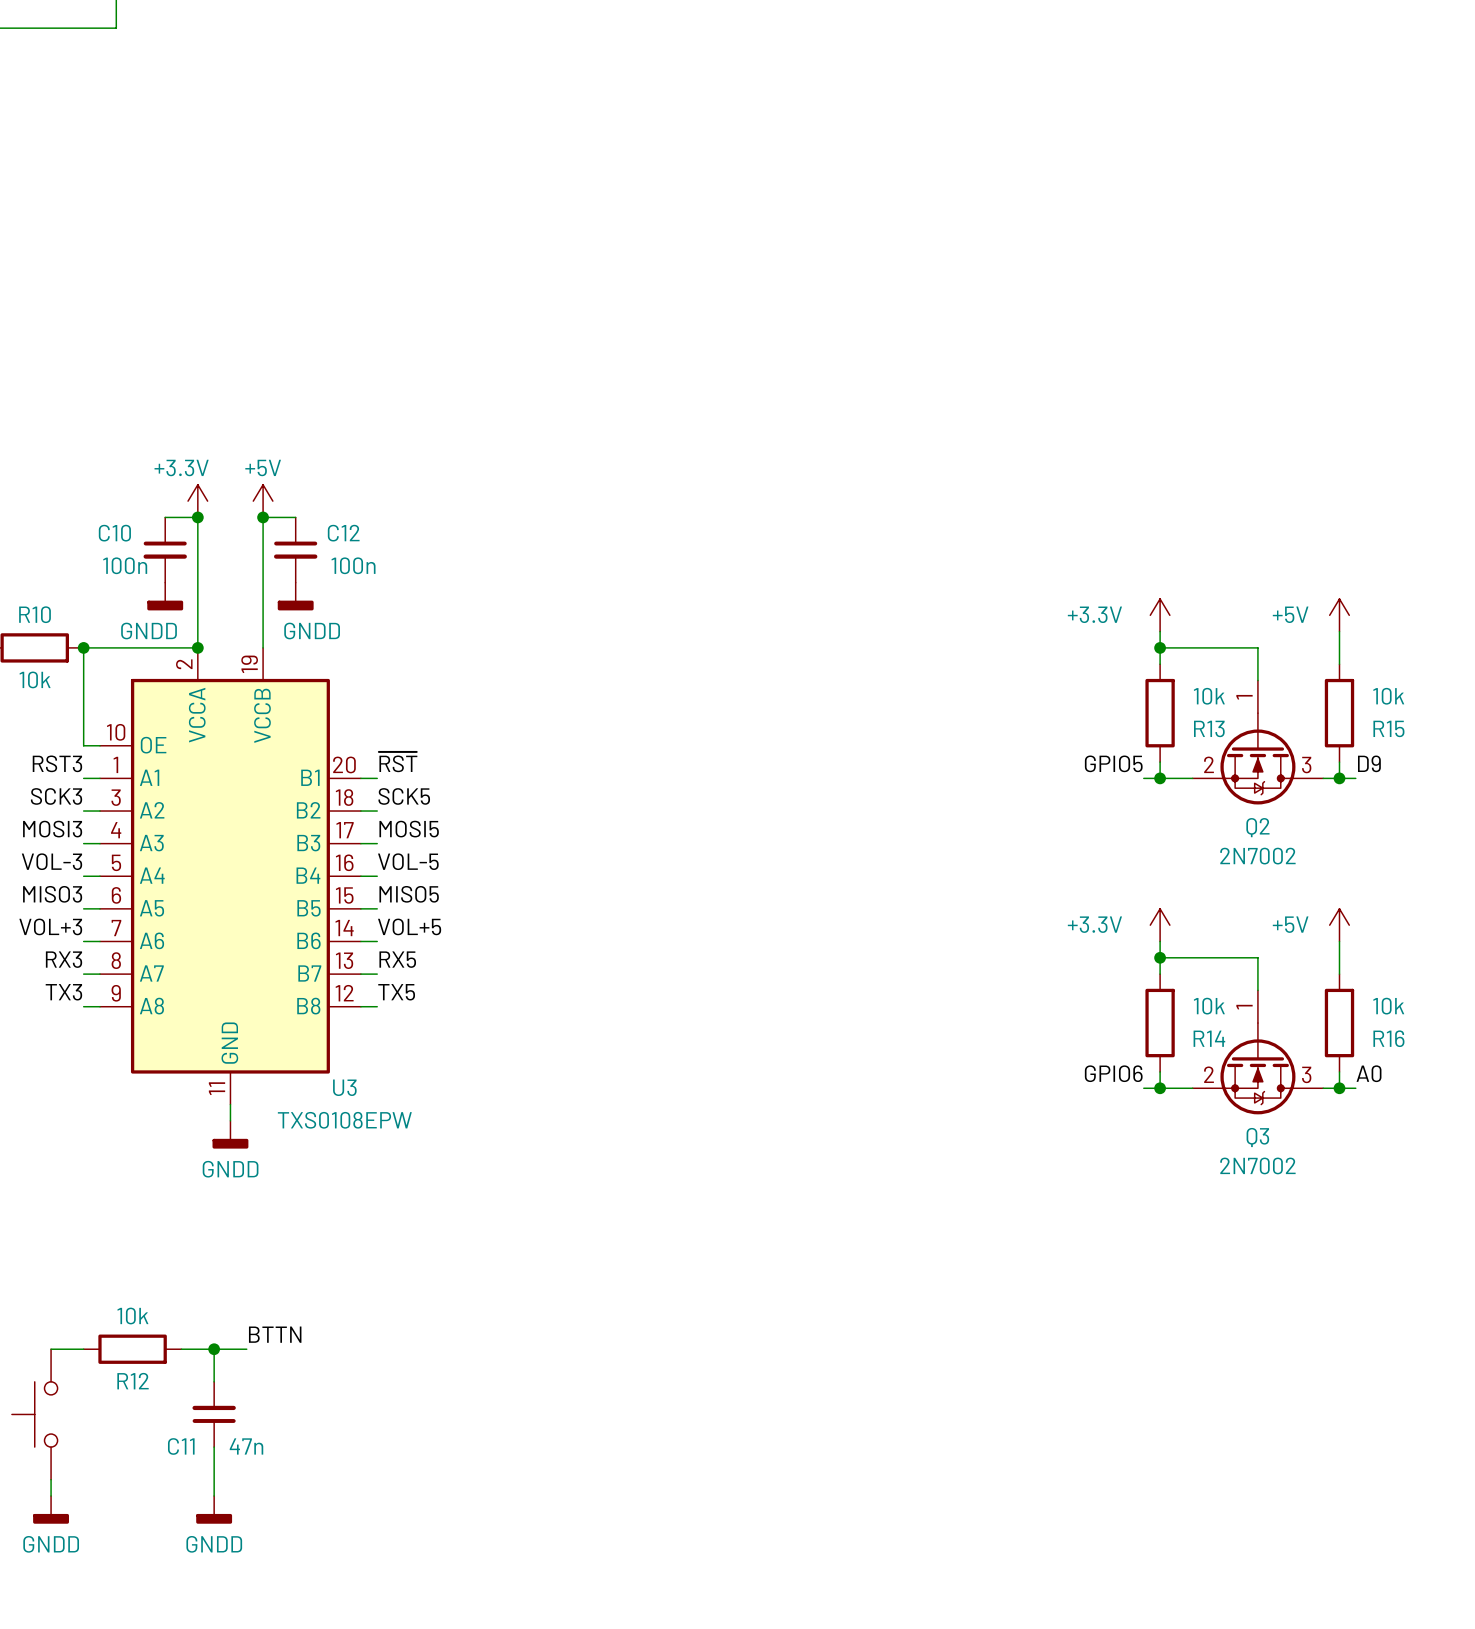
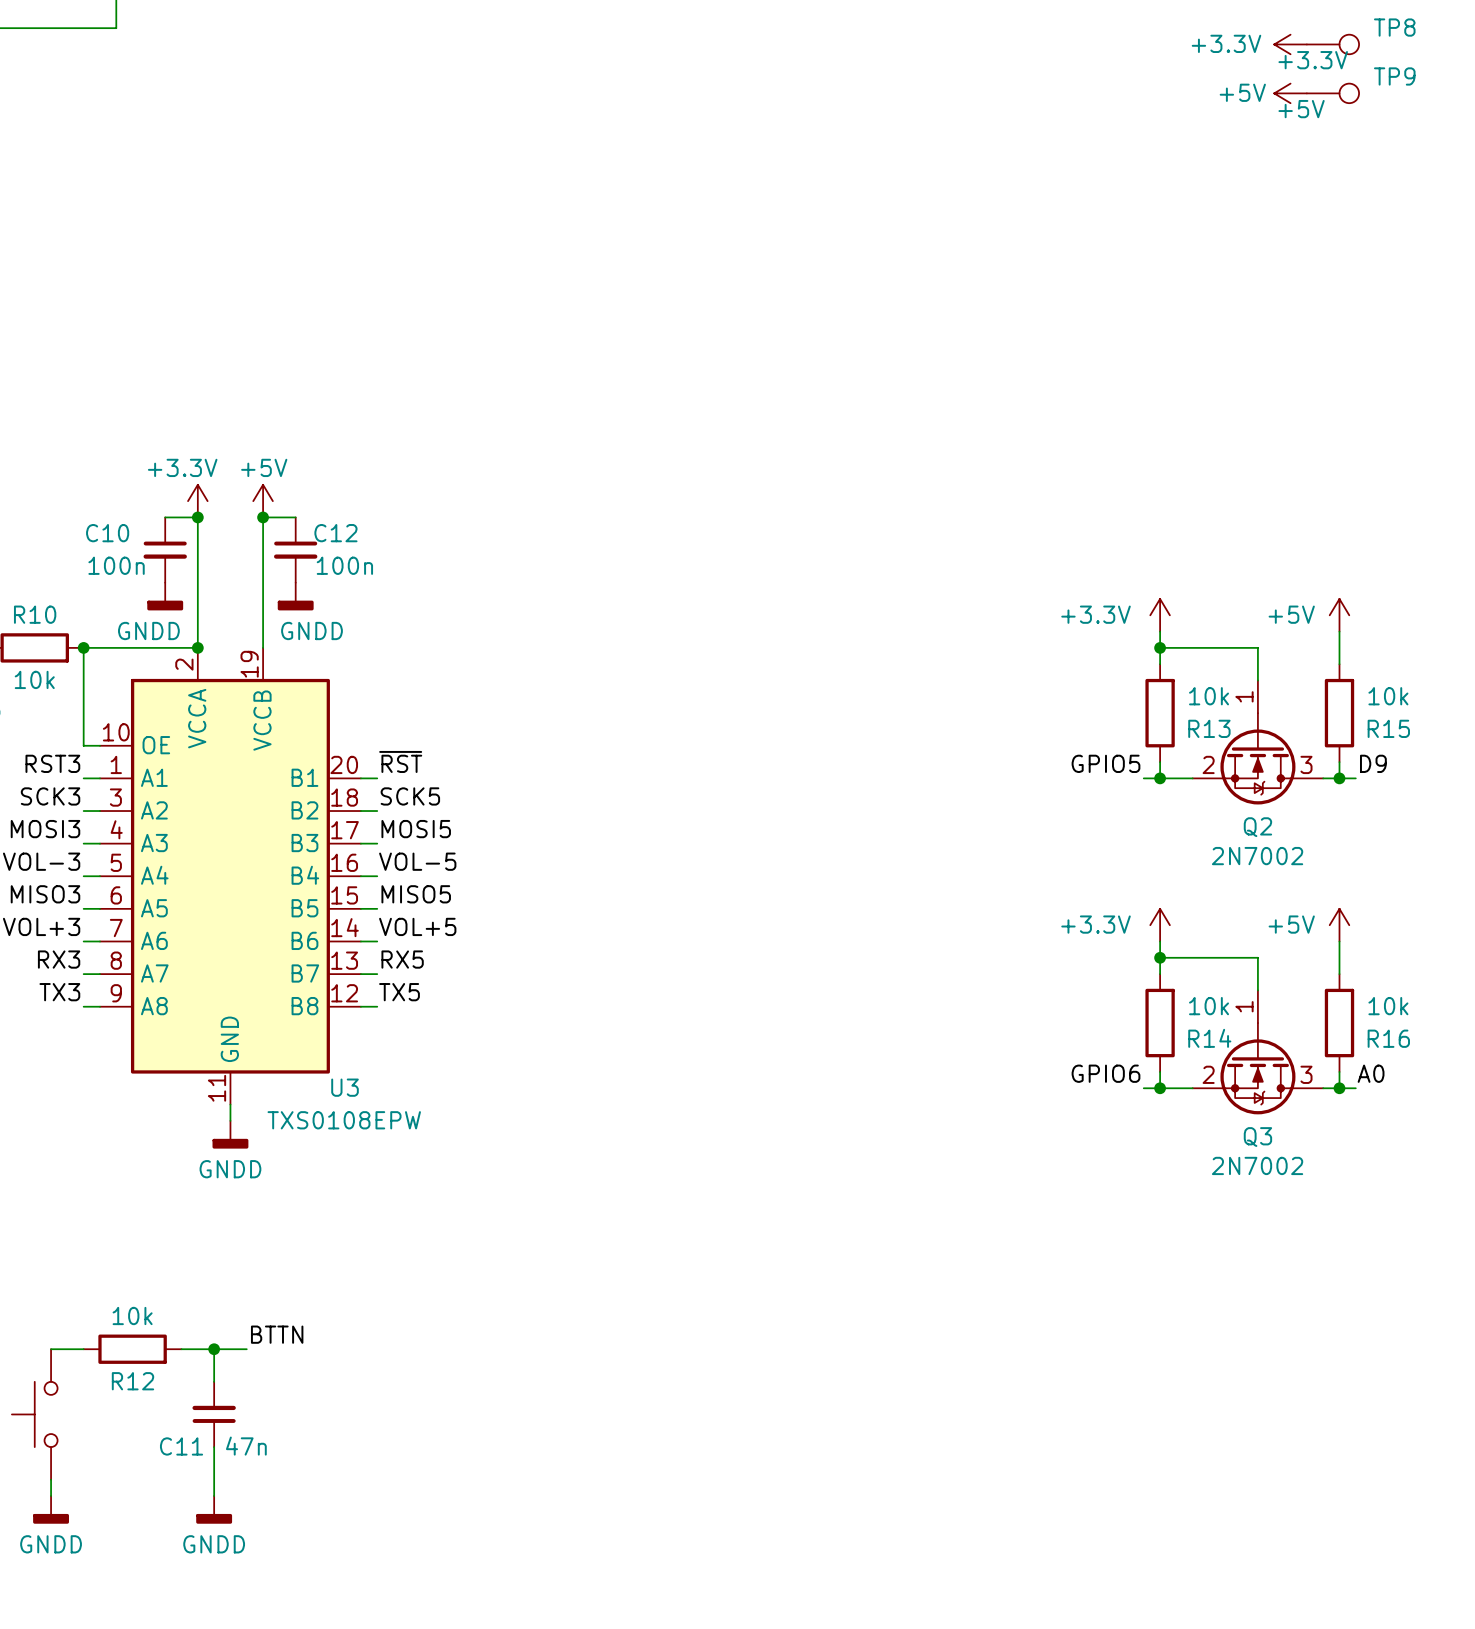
power symbol: none -> +3.3V (1290, 44)
TP8: none -> +3.3V (1332, 44)
power symbol: none -> +5V (1290, 93)
TP9: none -> +5V (1332, 93)

